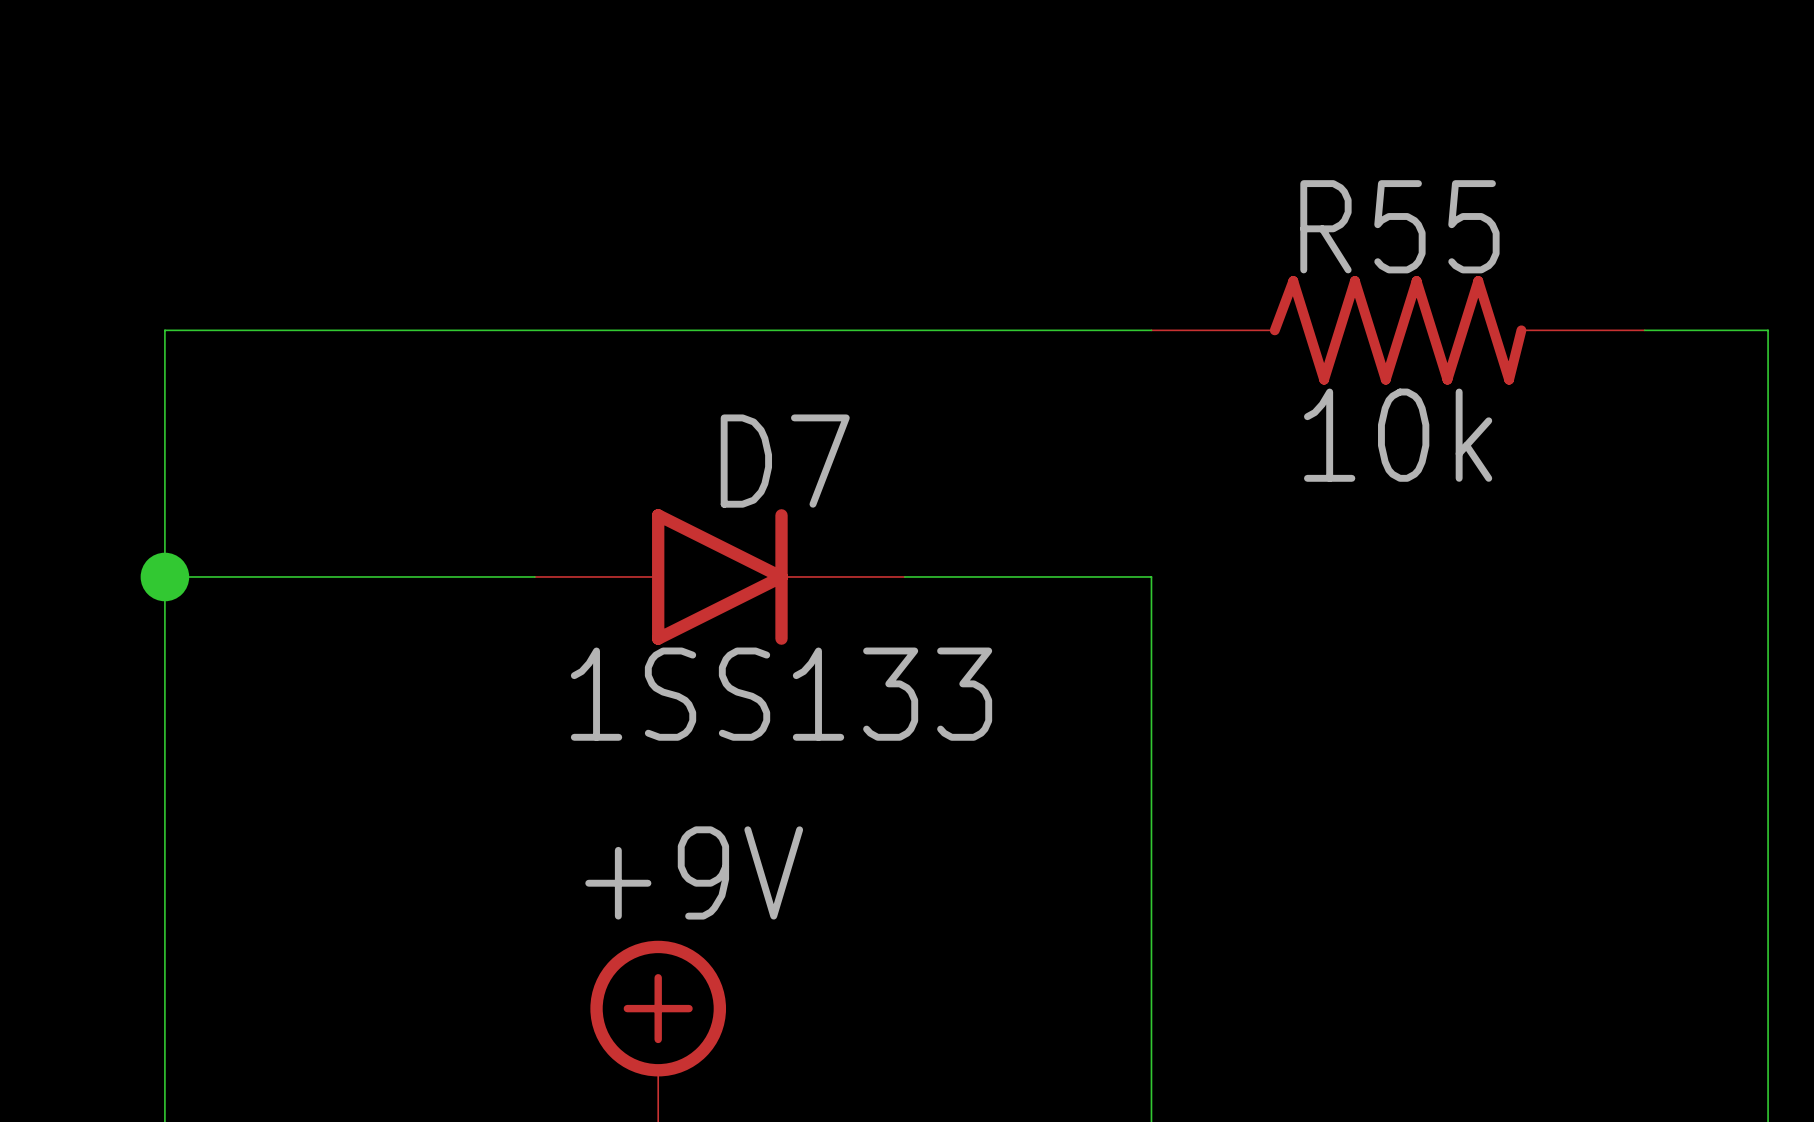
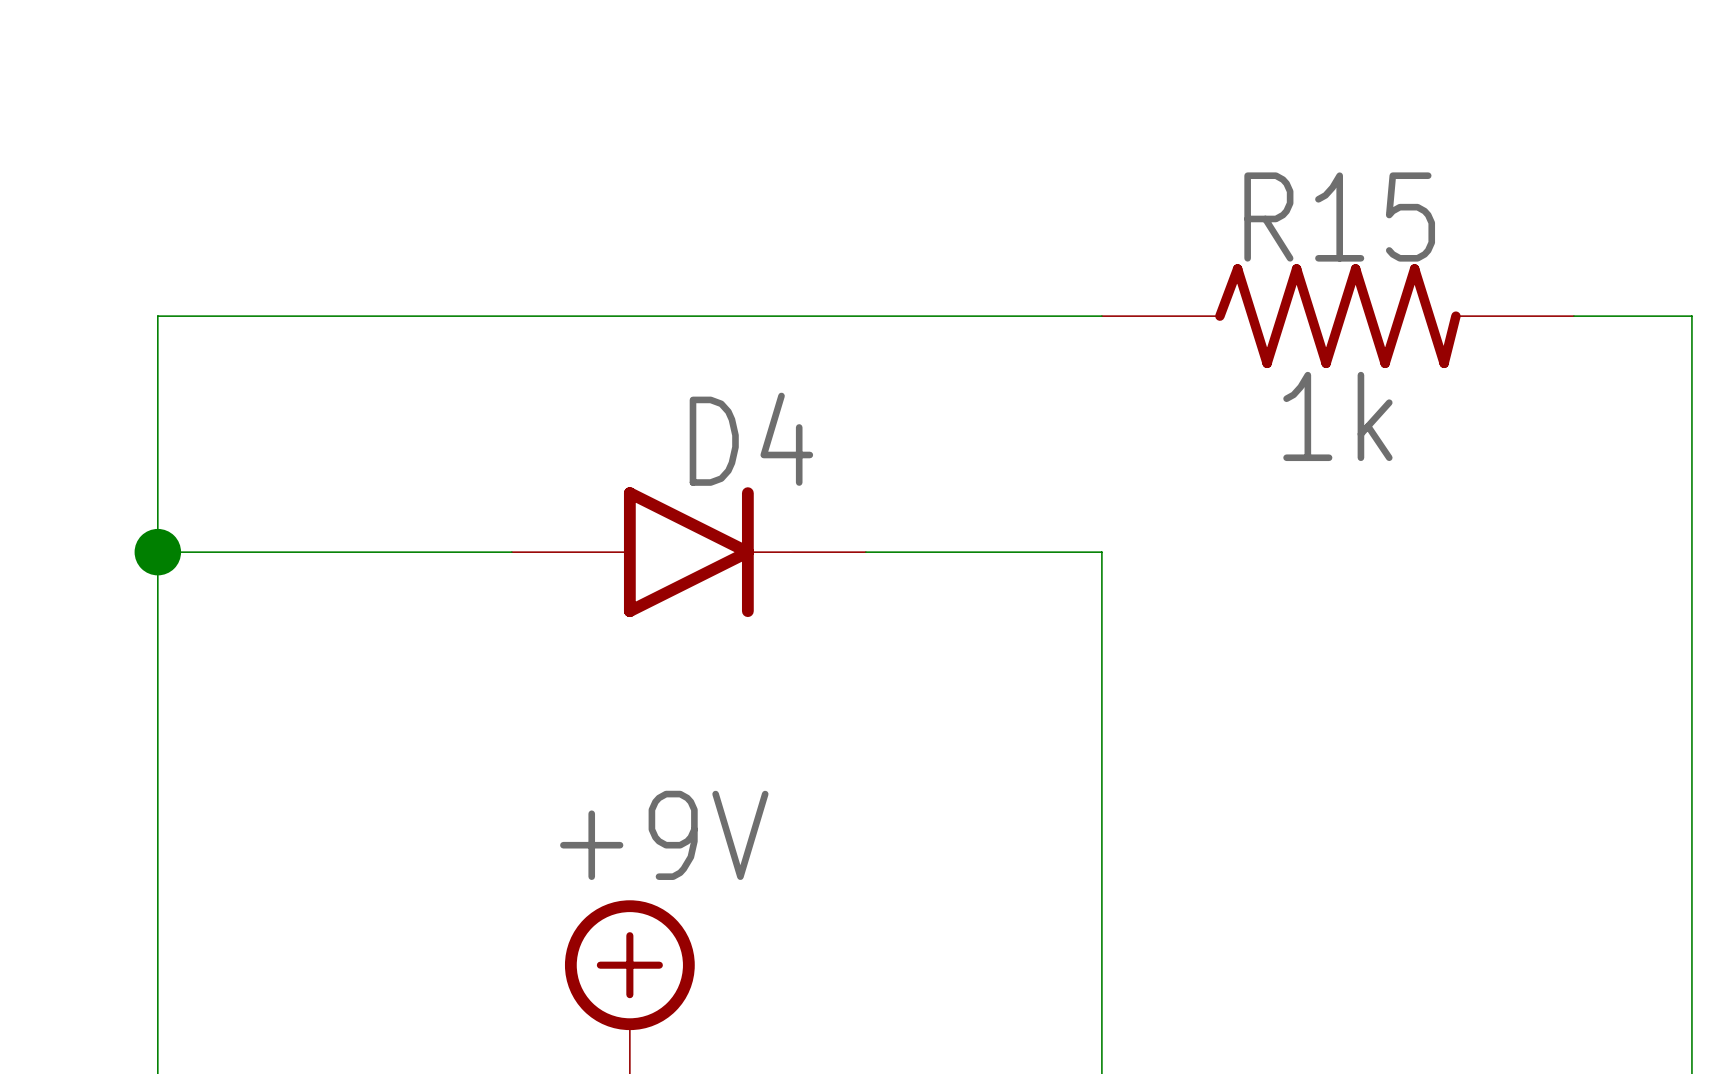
R55 name: R55 (1399, 226) -> R15 (1339, 217)
R55 value: 10k (1398, 435) -> 1k (1337, 416)
D7 name: D7 (785, 461) -> D4 (751, 439)
D7 value: 1SS133 (781, 694) -> none

